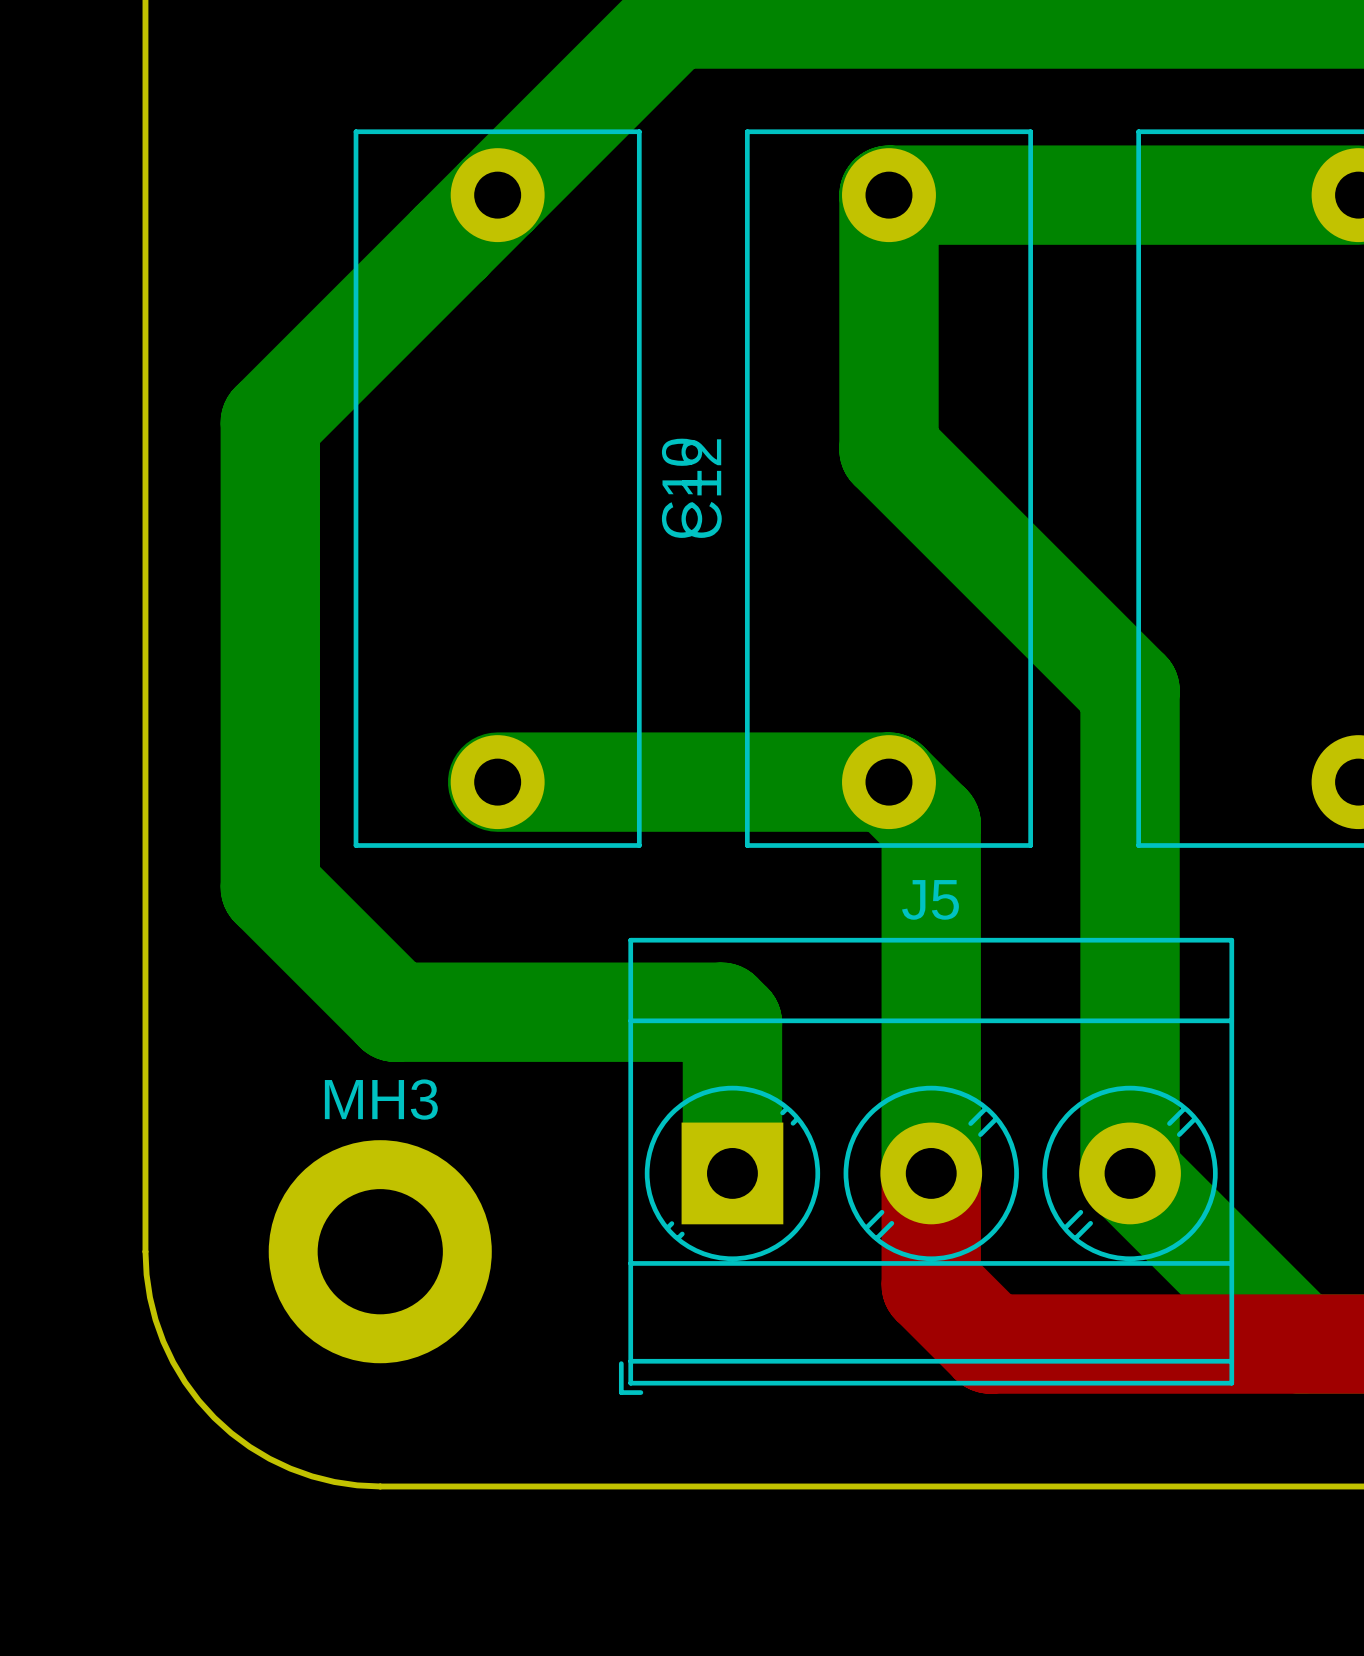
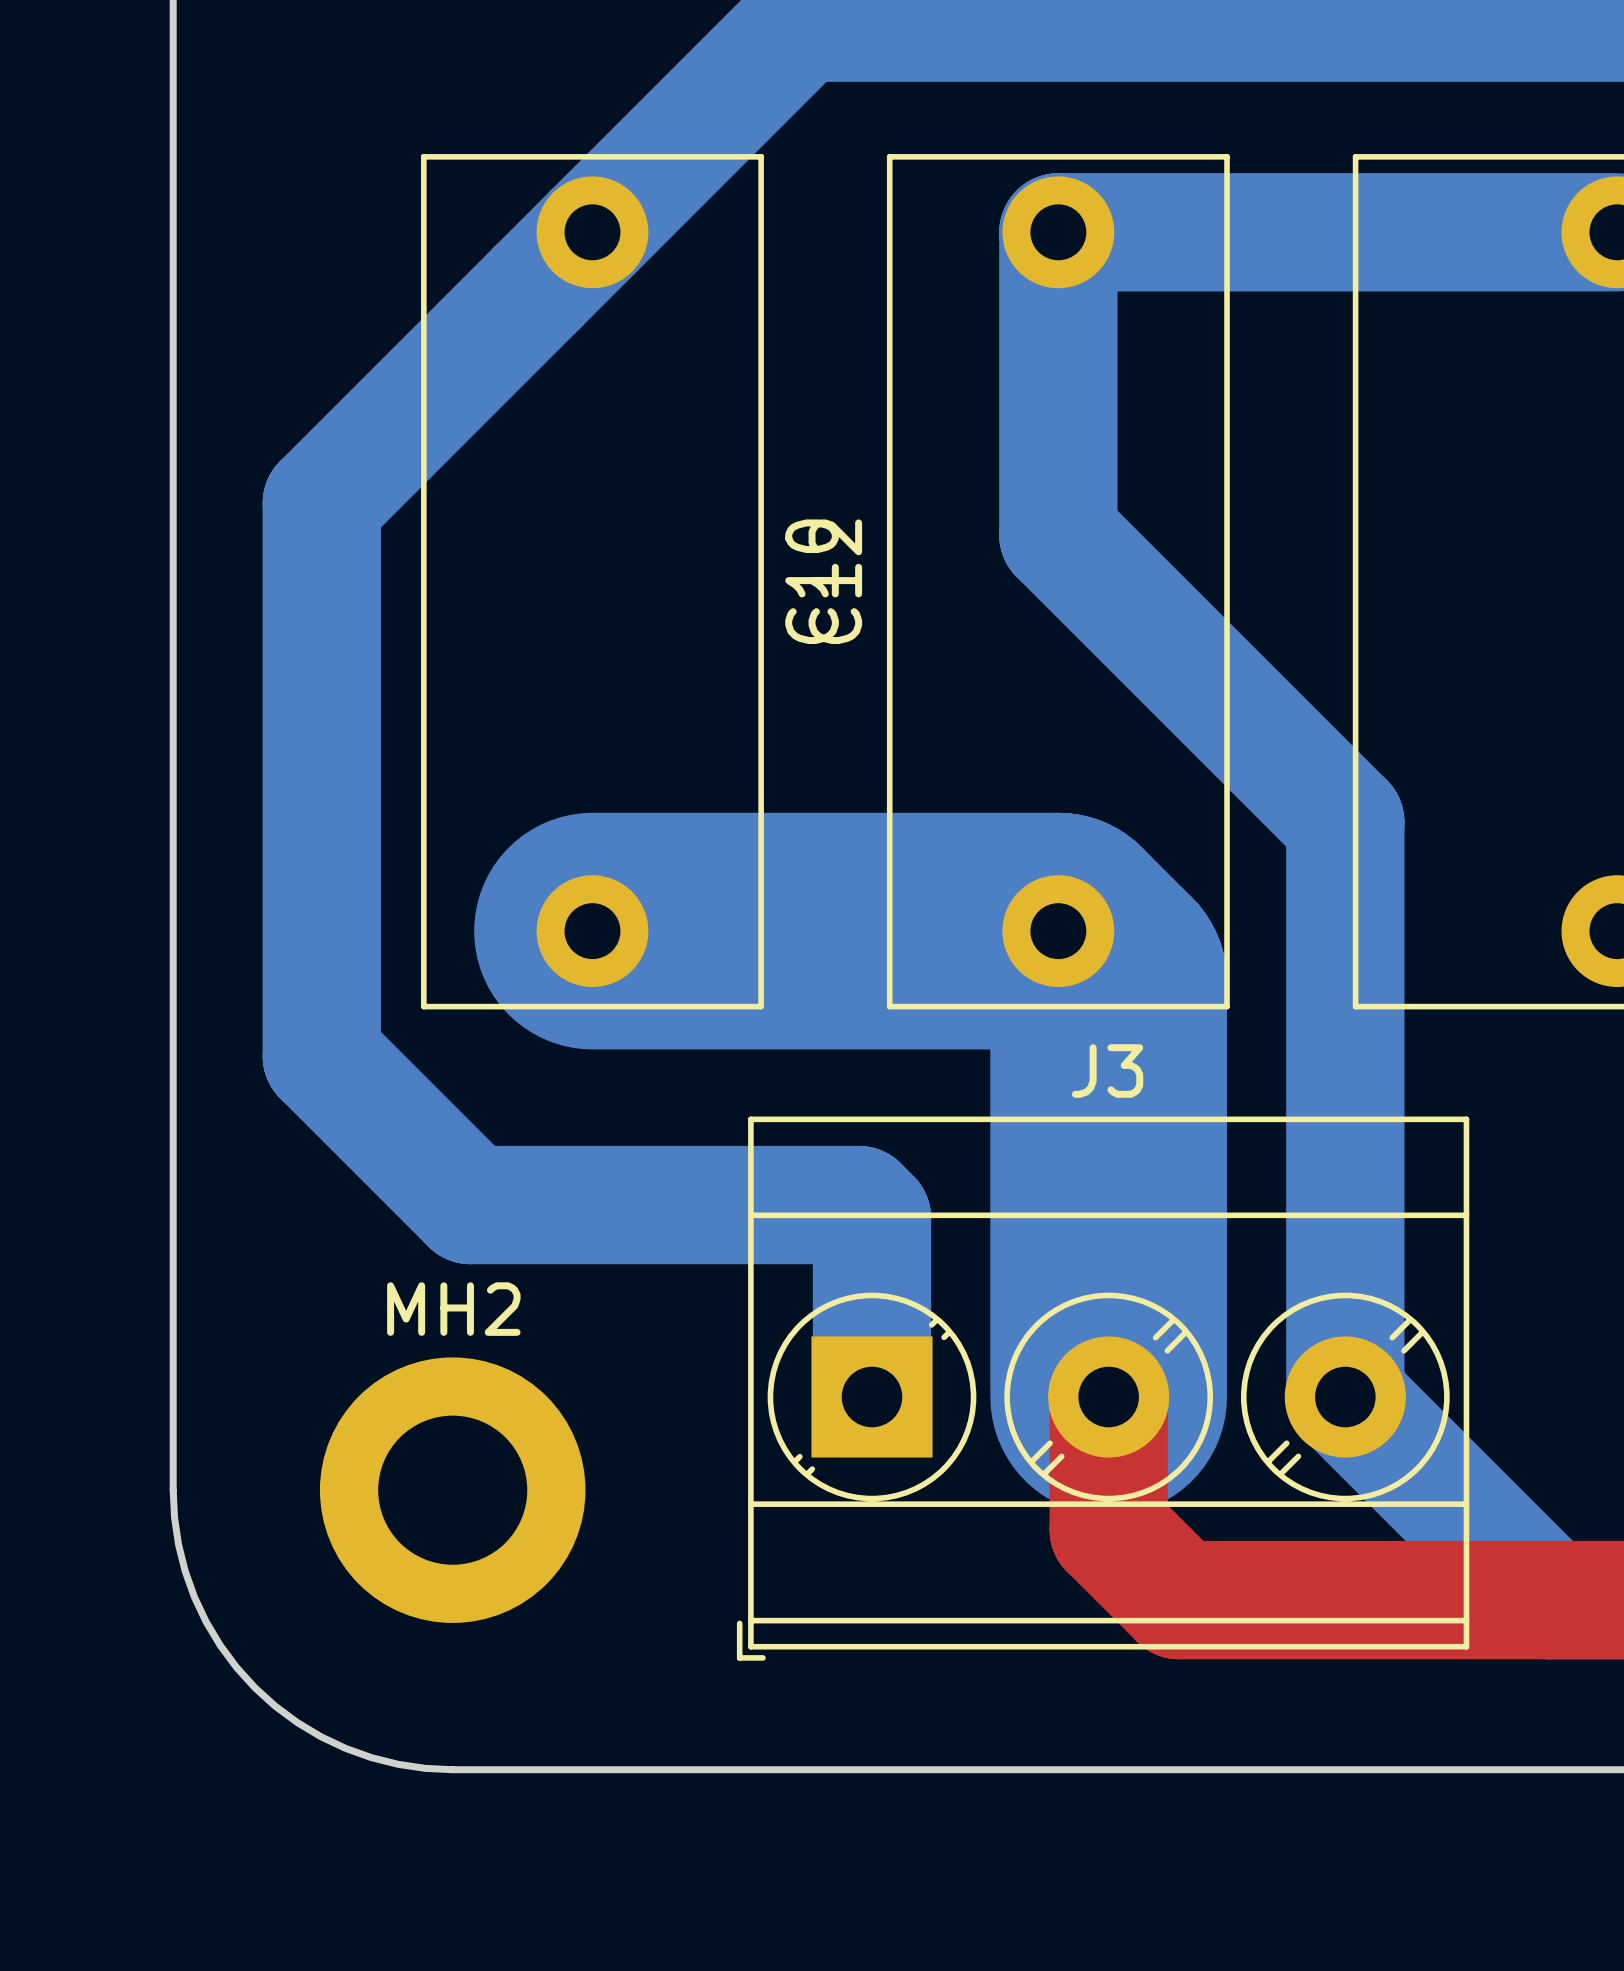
bottom track width: thin (497, 782) (888, 782) (931, 824) (931, 1173) -> thick (592, 931) (1058, 931) (1108, 981) (1108, 1397)
J5 name: J5 (930, 899) -> J3 (1107, 1071)
MH3 name: MH3 (381, 1099) -> MH2 (453, 1309)

